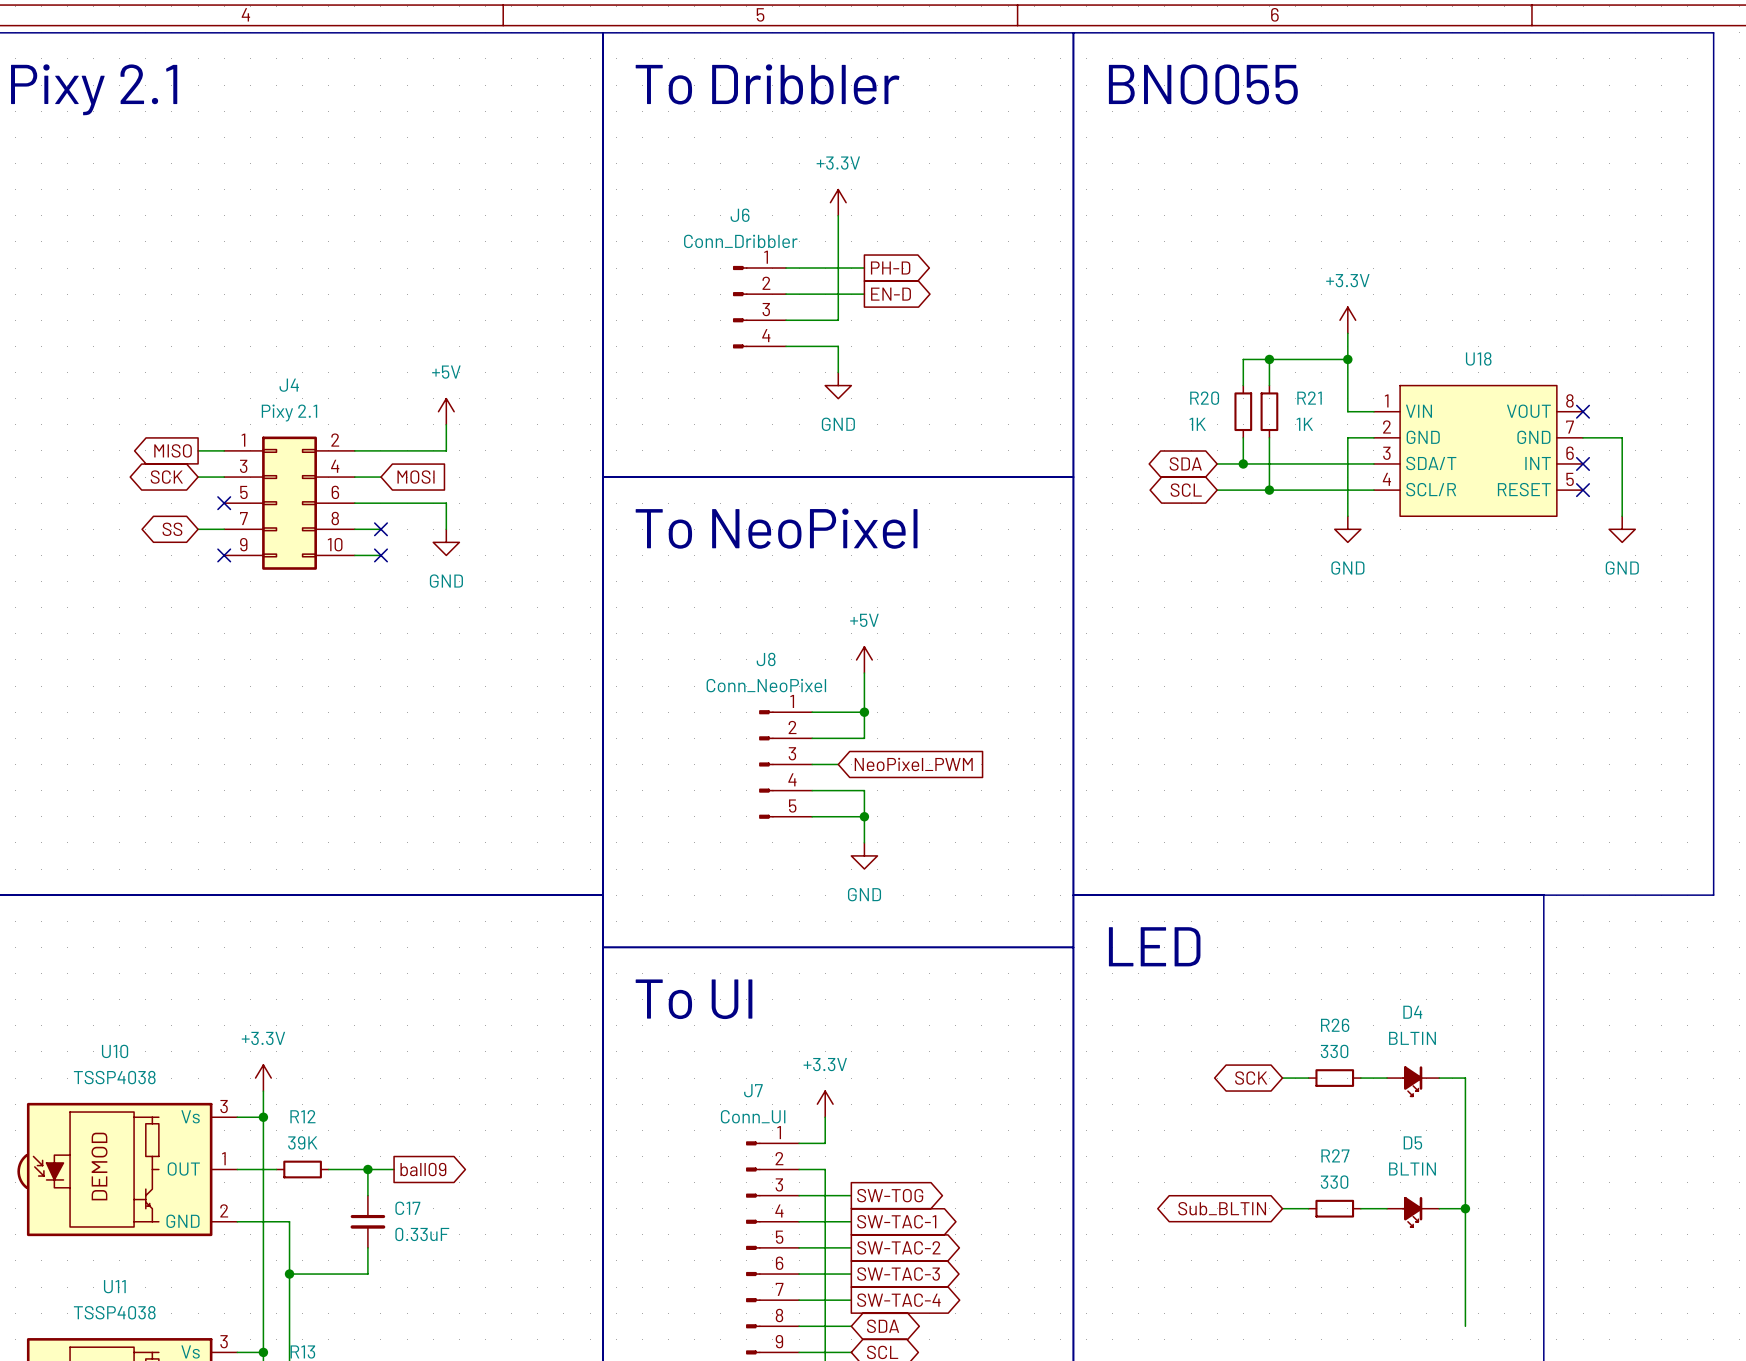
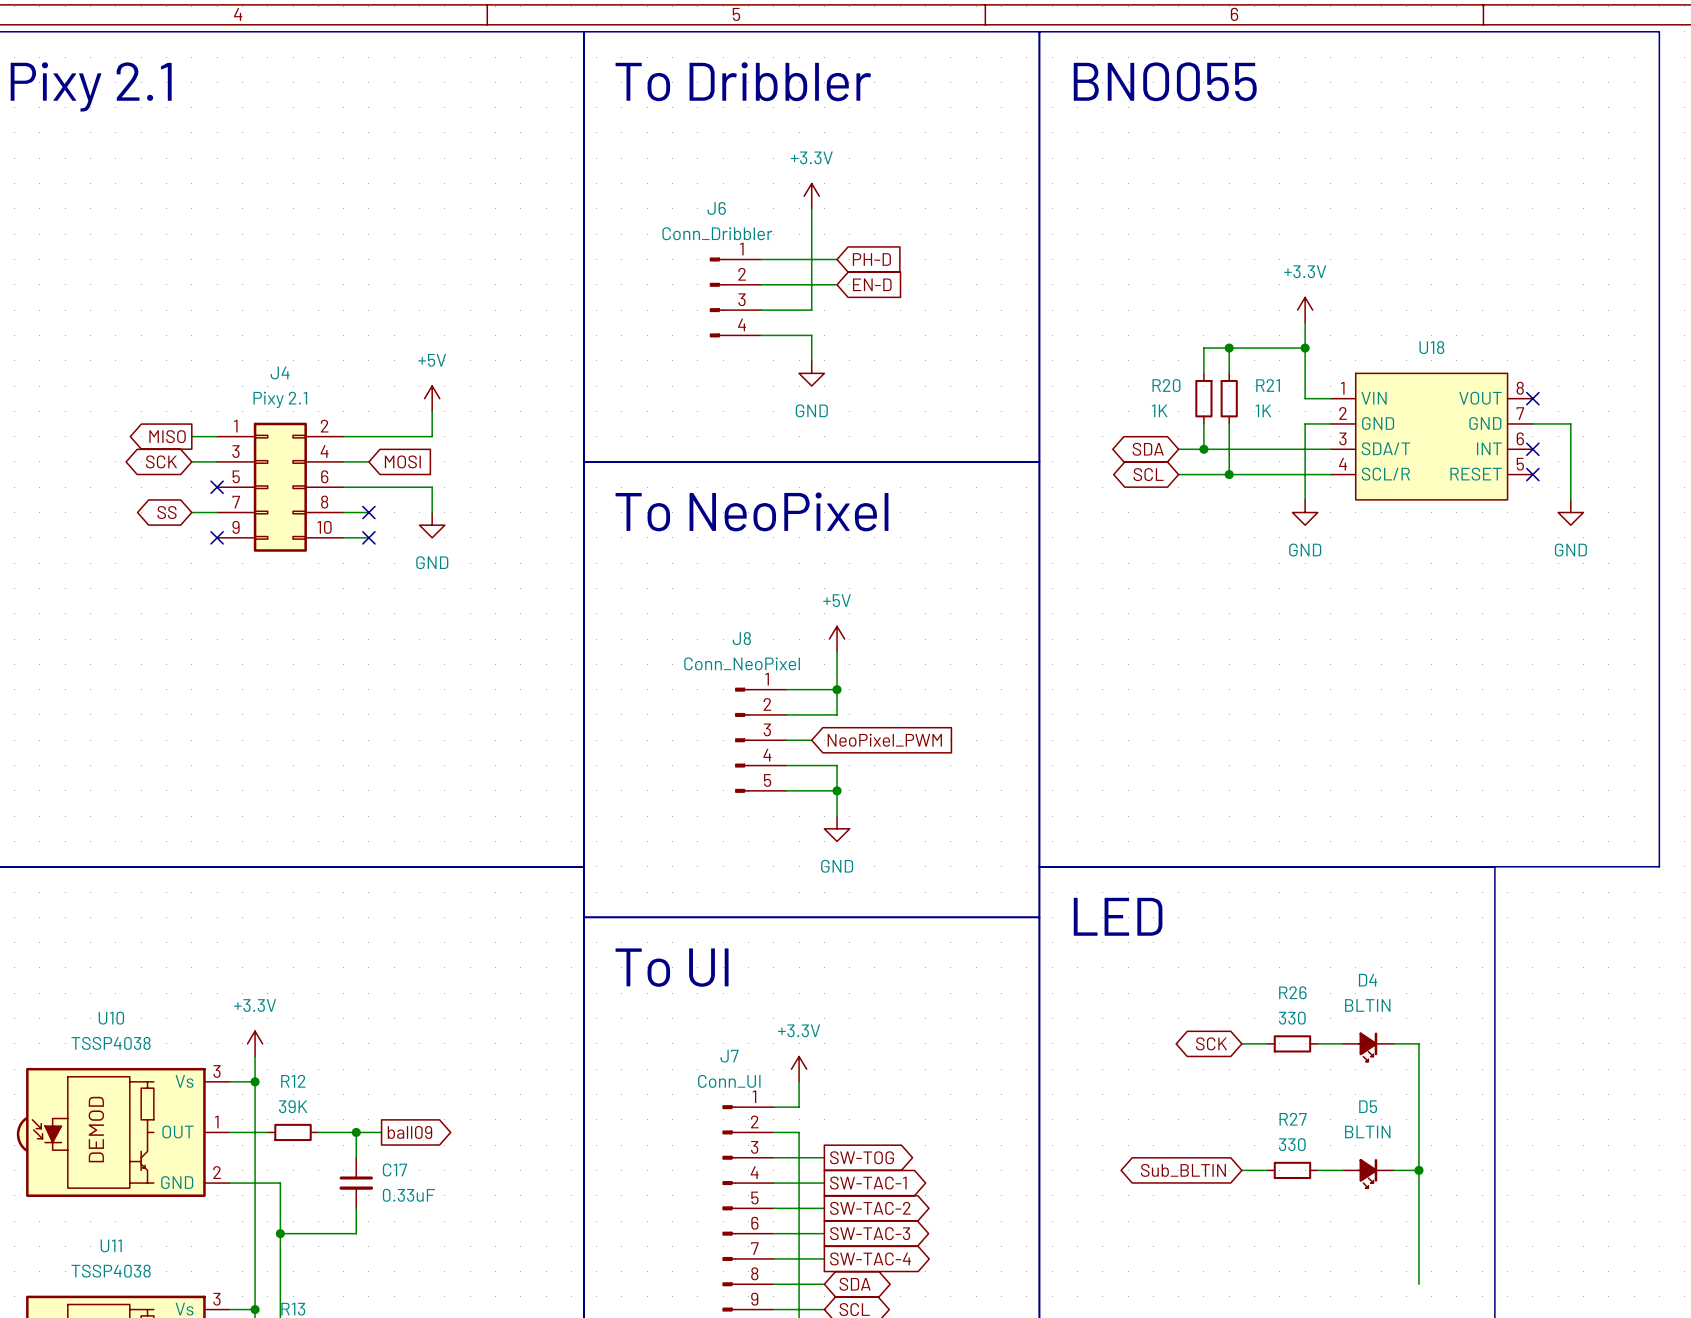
global label shape: output (890, 267) -> input (871, 259)
global label shape: output (891, 294) -> input (872, 284)

